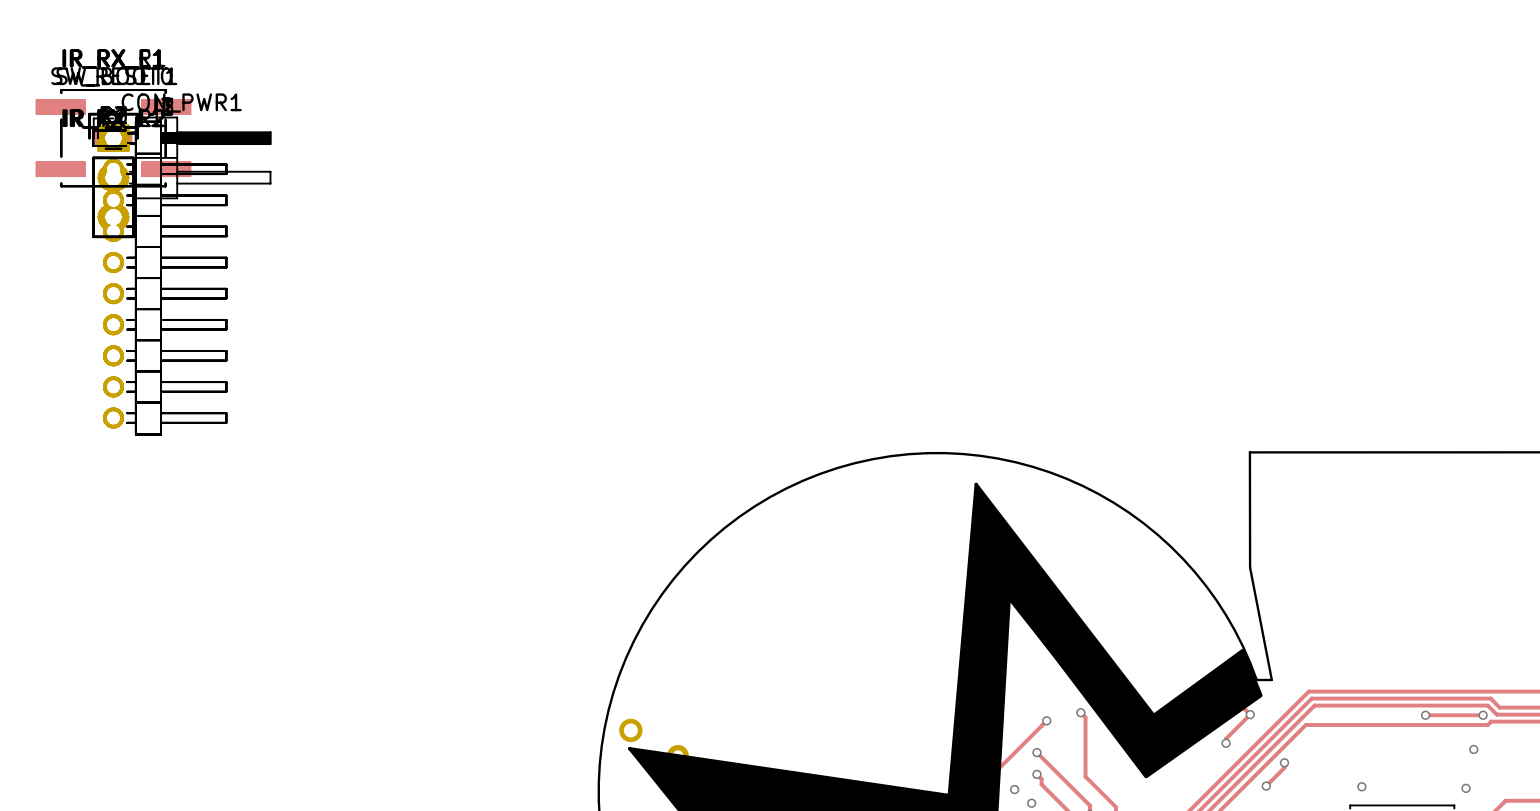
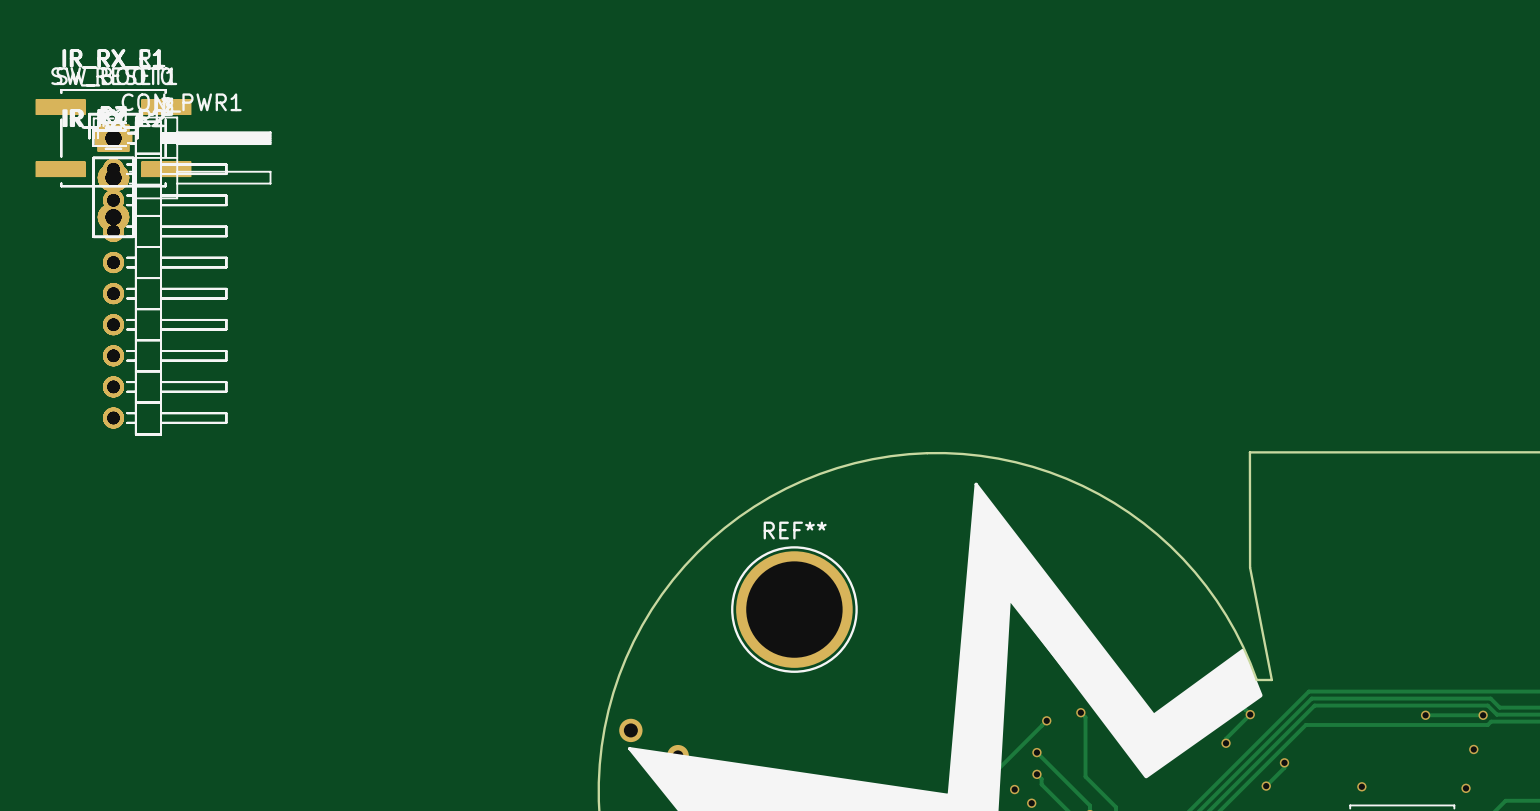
REF**: none -> (794, 609)

